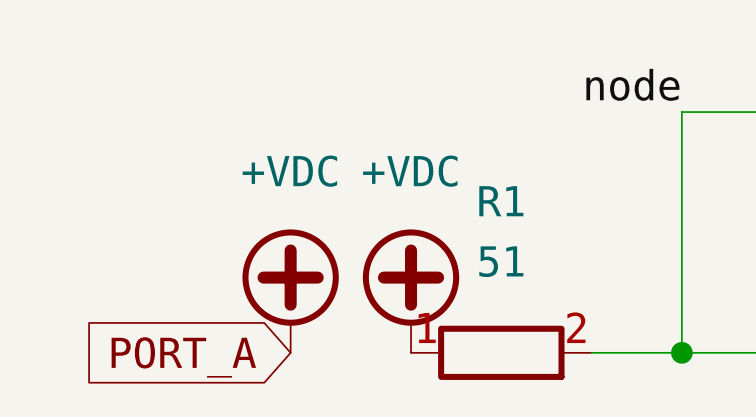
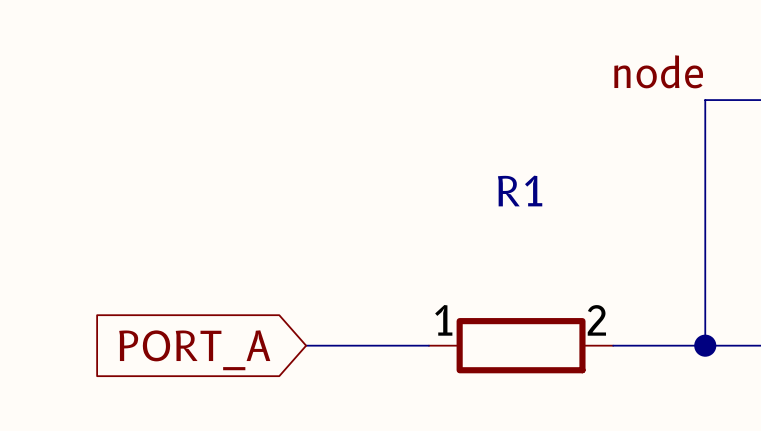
R1 value: 51 (501, 261) -> none
power symbol: +VDC (290, 291) -> none
power symbol: +VDC (411, 291) -> none
wire: none -> (306, 345) (428, 345)

